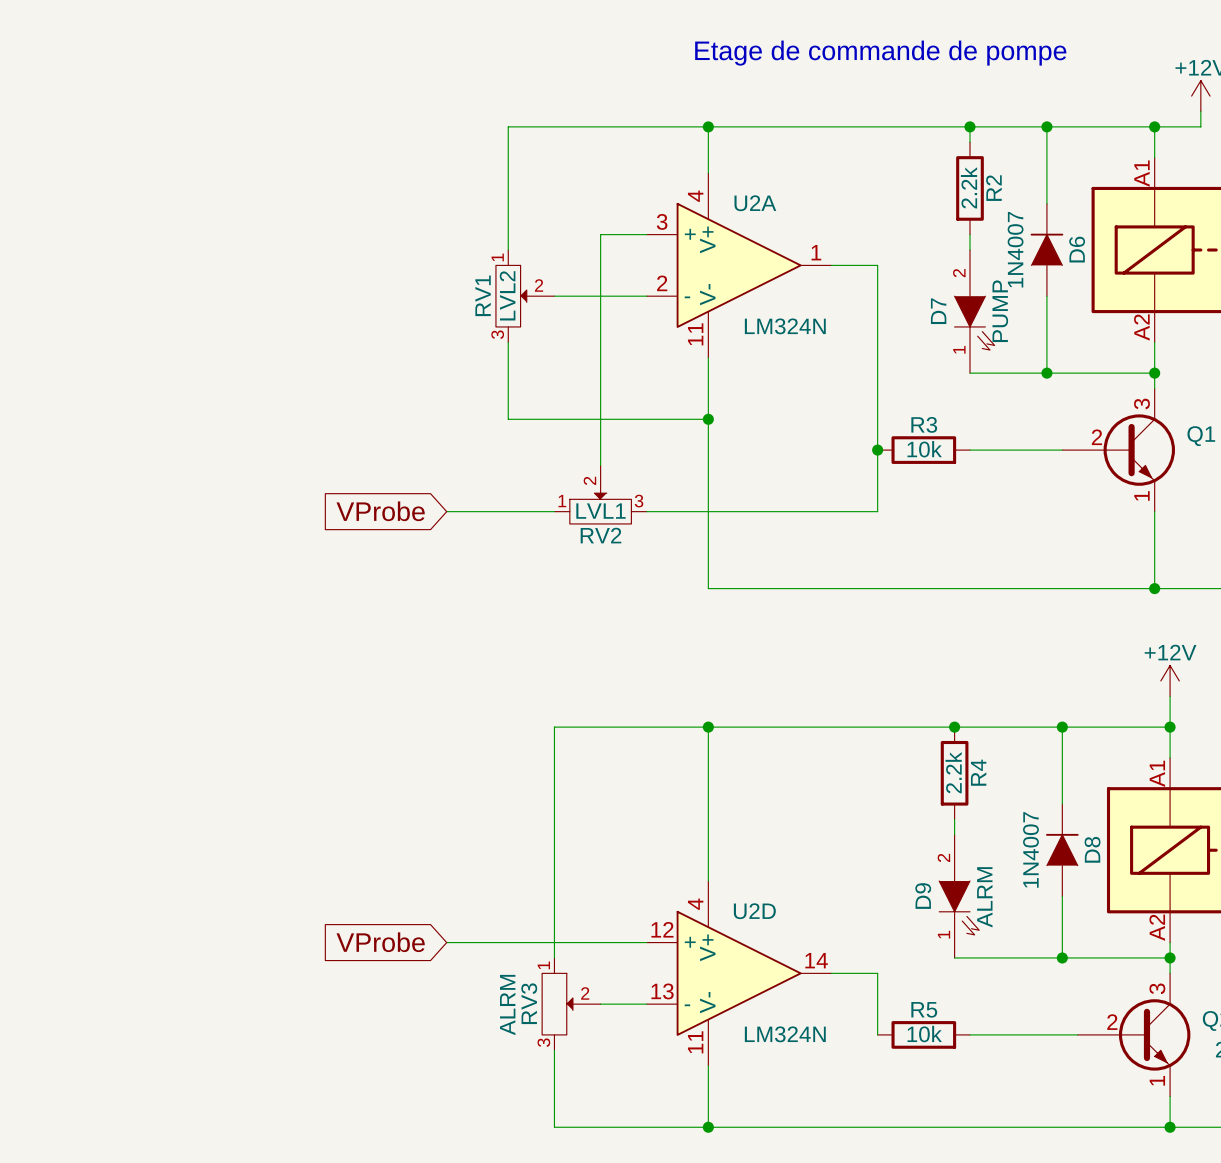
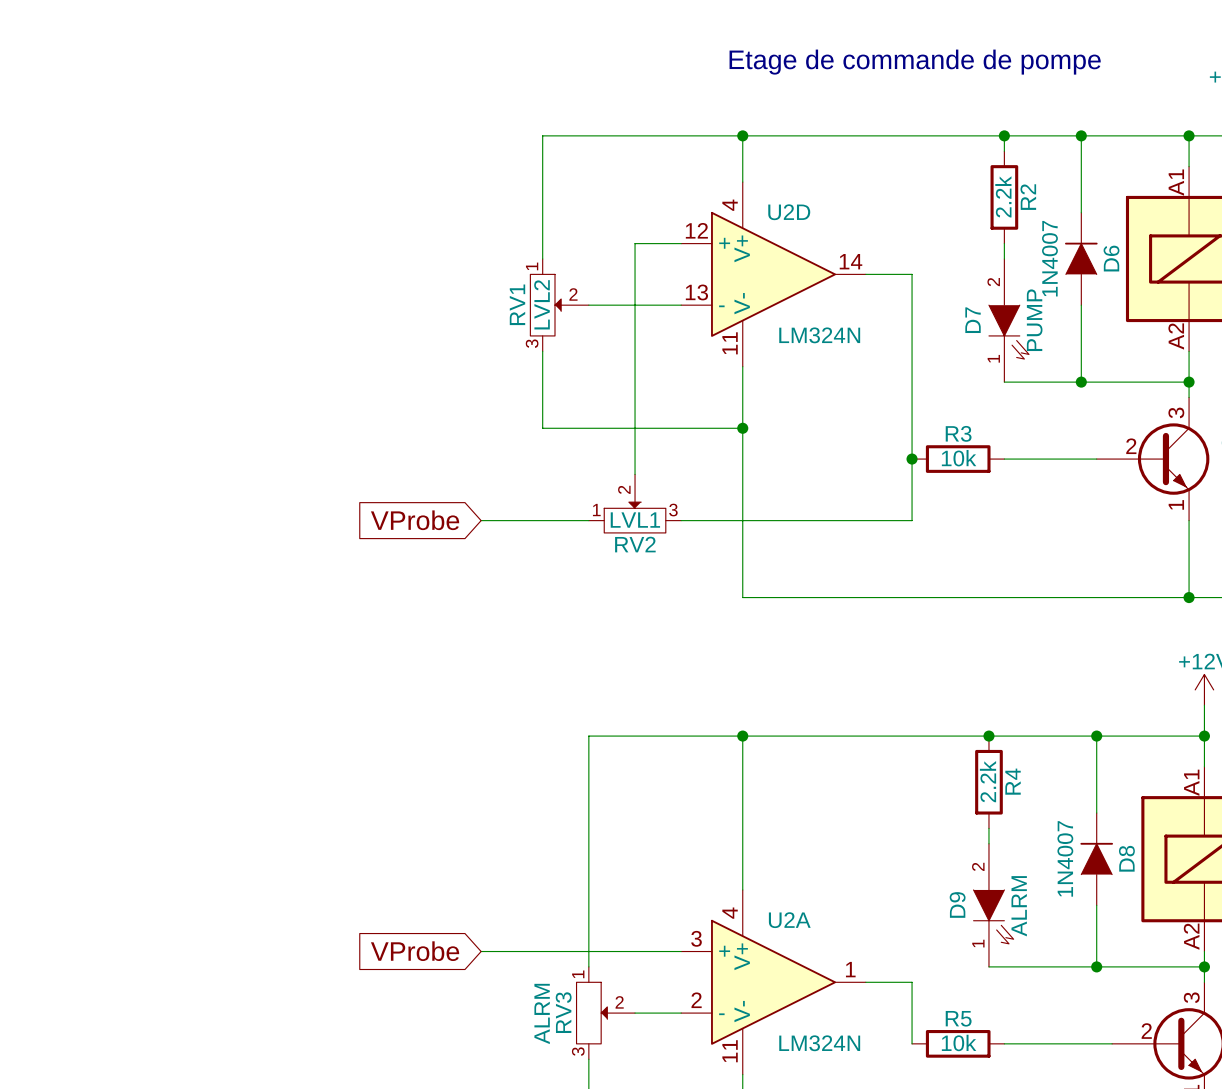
U2A position: (739, 265) -> (773, 982)
U2D position: (739, 973) -> (773, 274)

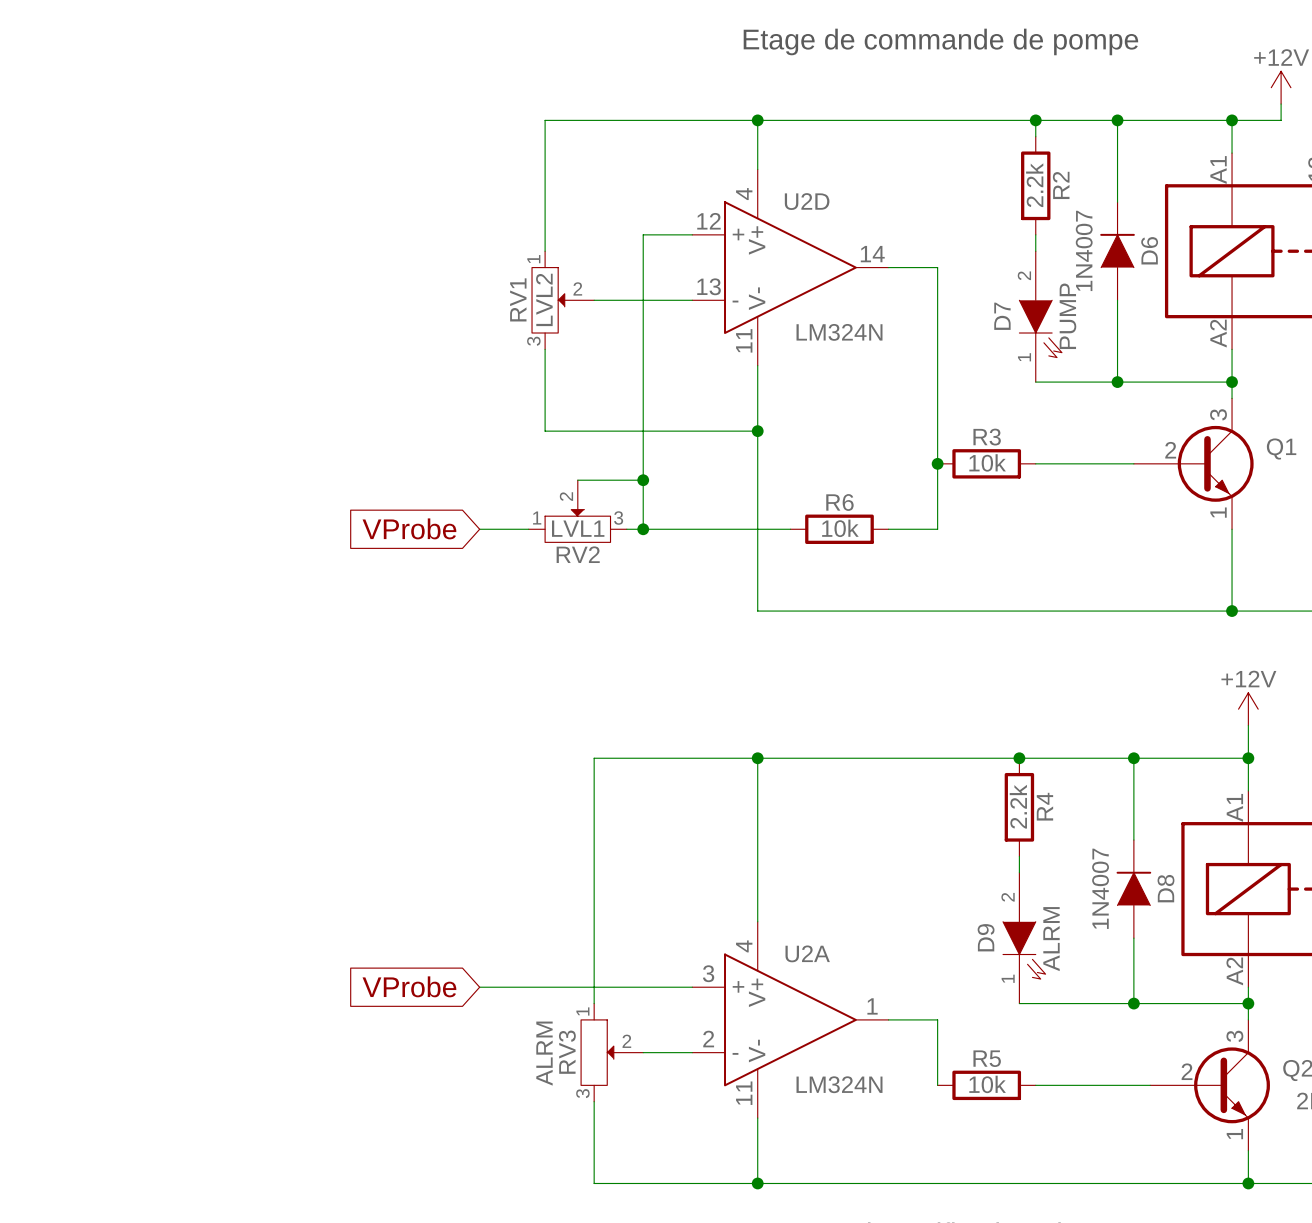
wire: none -> (577, 480) (643, 480) (643, 529)
junction: none -> (643, 480)
RV2 position: (635, 503) -> (577, 511)
wire: (527, 520) (588, 520) -> (626, 529) (692, 529)
junction: none -> (643, 529)
wire: (773, 520) (865, 520) -> none
R6: none -> 10k (839, 529)

